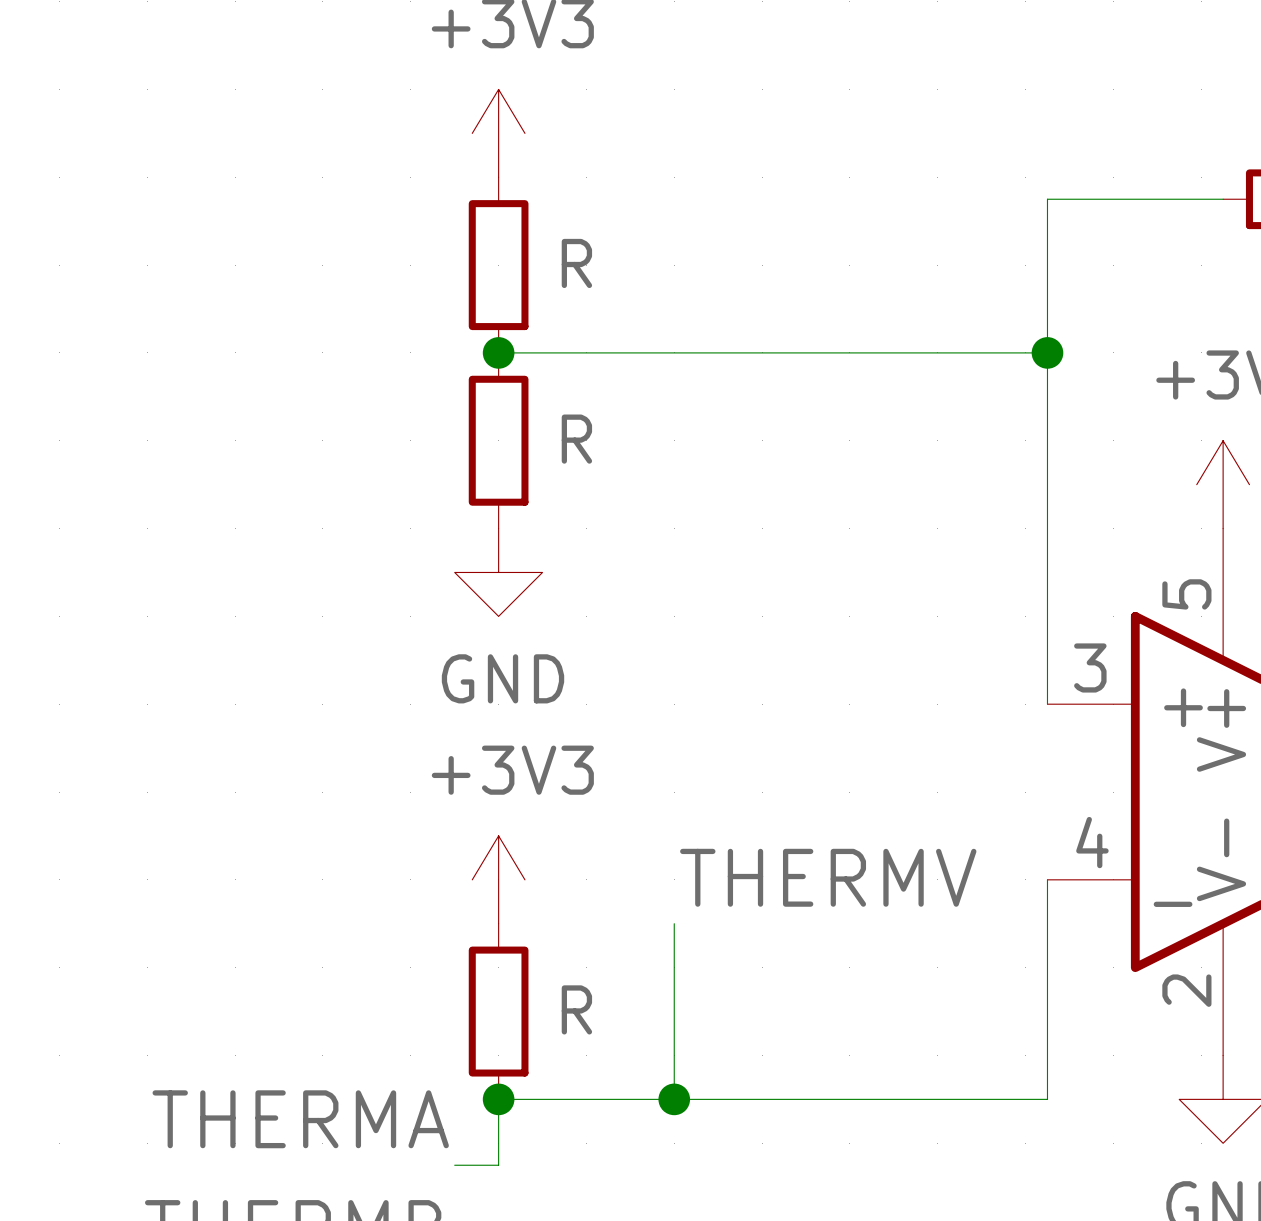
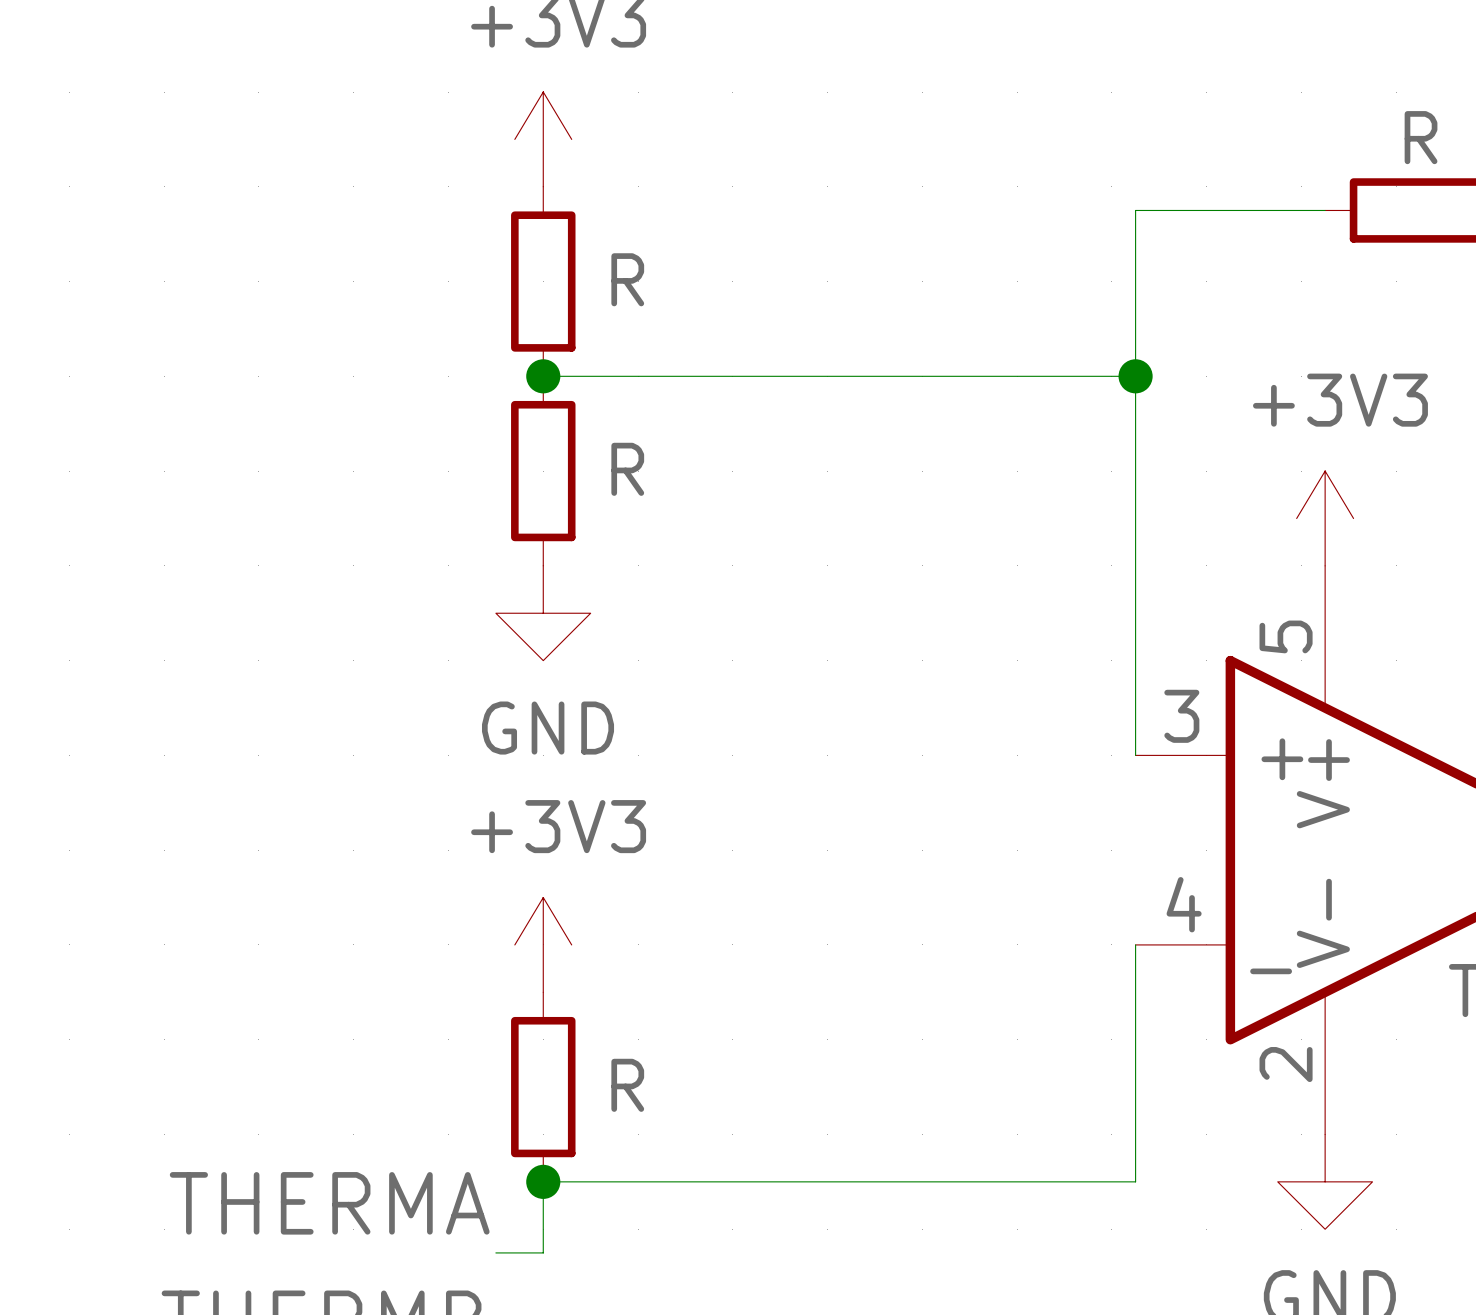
label: THERMV (828, 877) -> none
wire: (674, 923) (674, 1099) -> none
junction: (674, 1099) -> none

